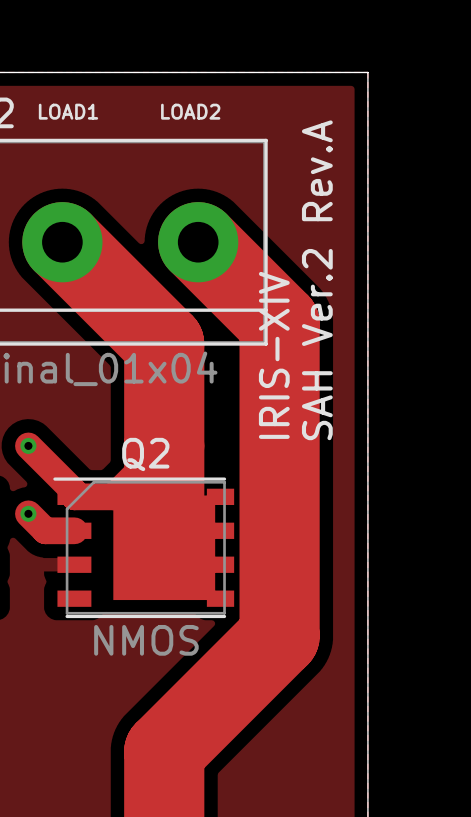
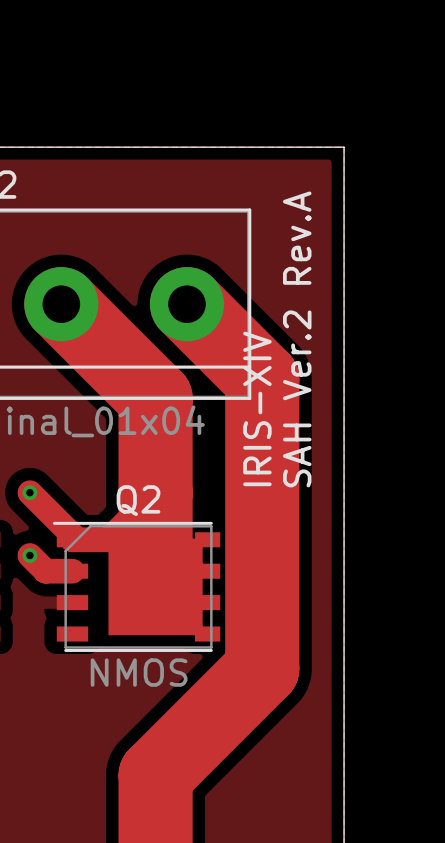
text: LOAD1 (68, 111) -> none
text: LOAD2 (190, 111) -> none

